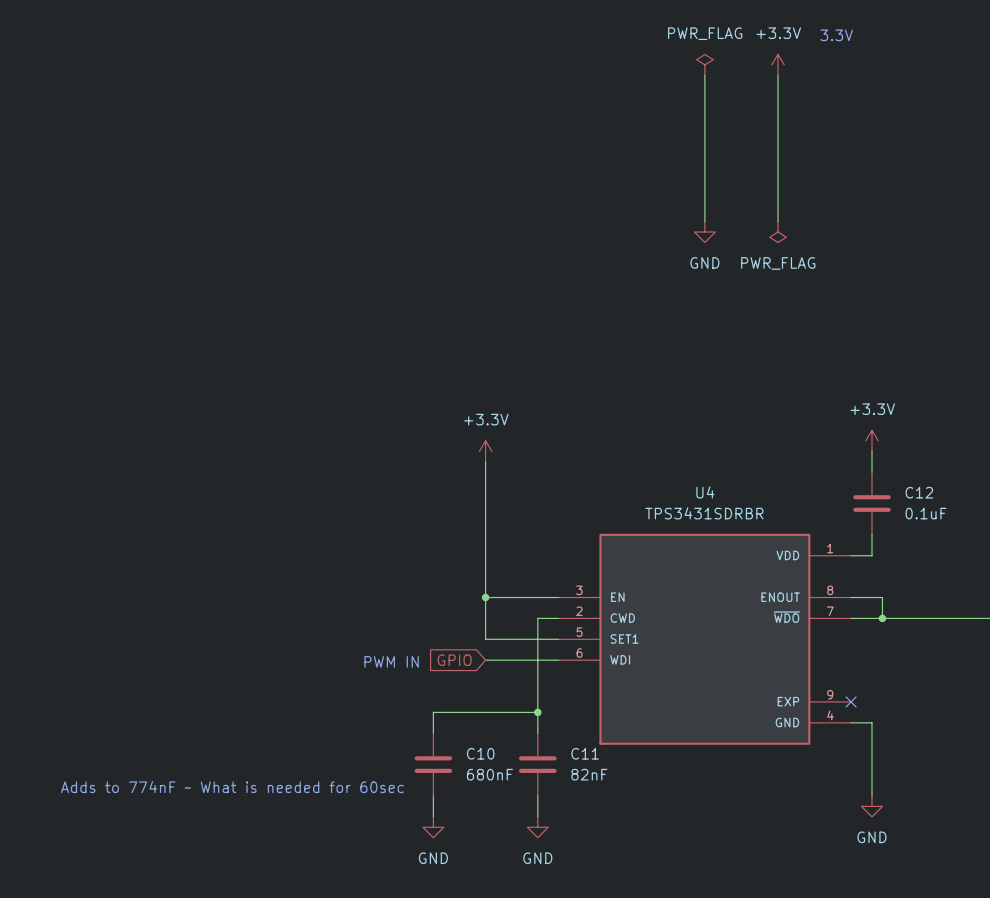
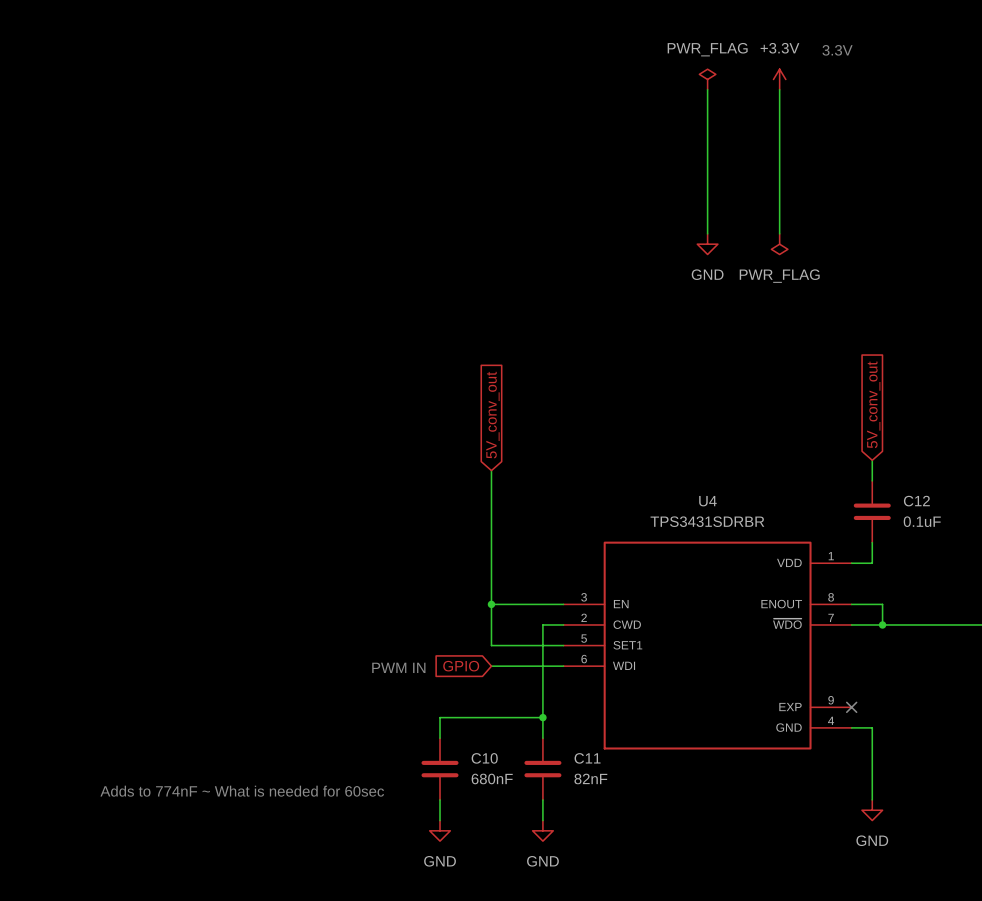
global label: none -> 5V_conv_out (873, 404)
global label: none -> 5V_conv_out (492, 415)
power symbol: +3.3V (872, 440) -> none
power symbol: +3.3V (485, 451) -> none

